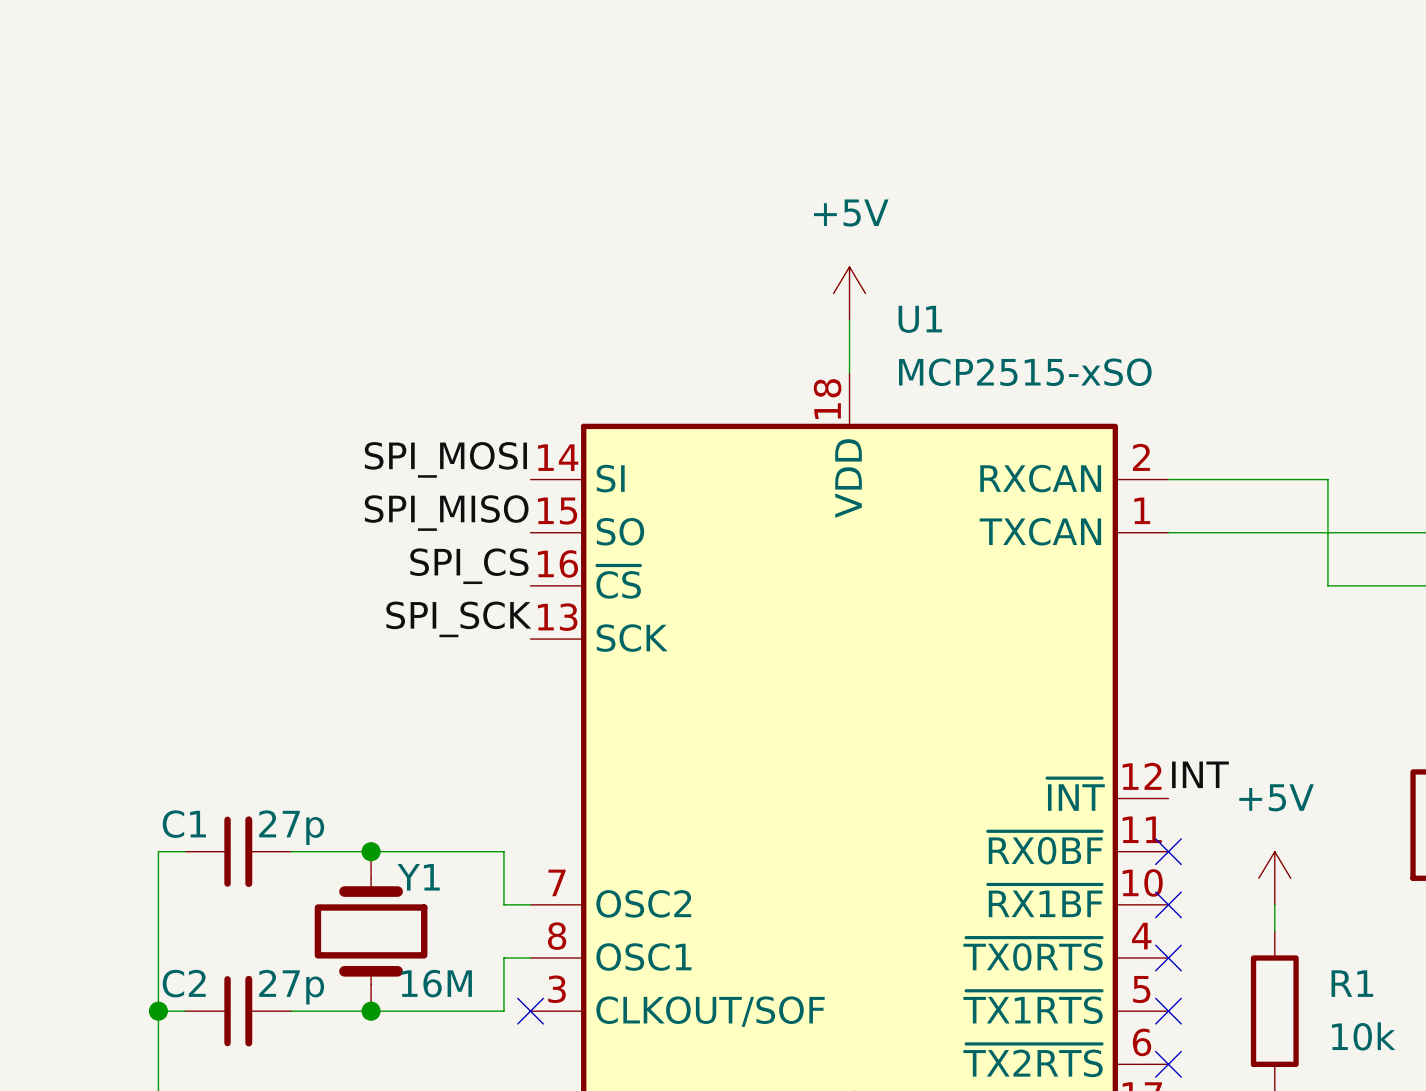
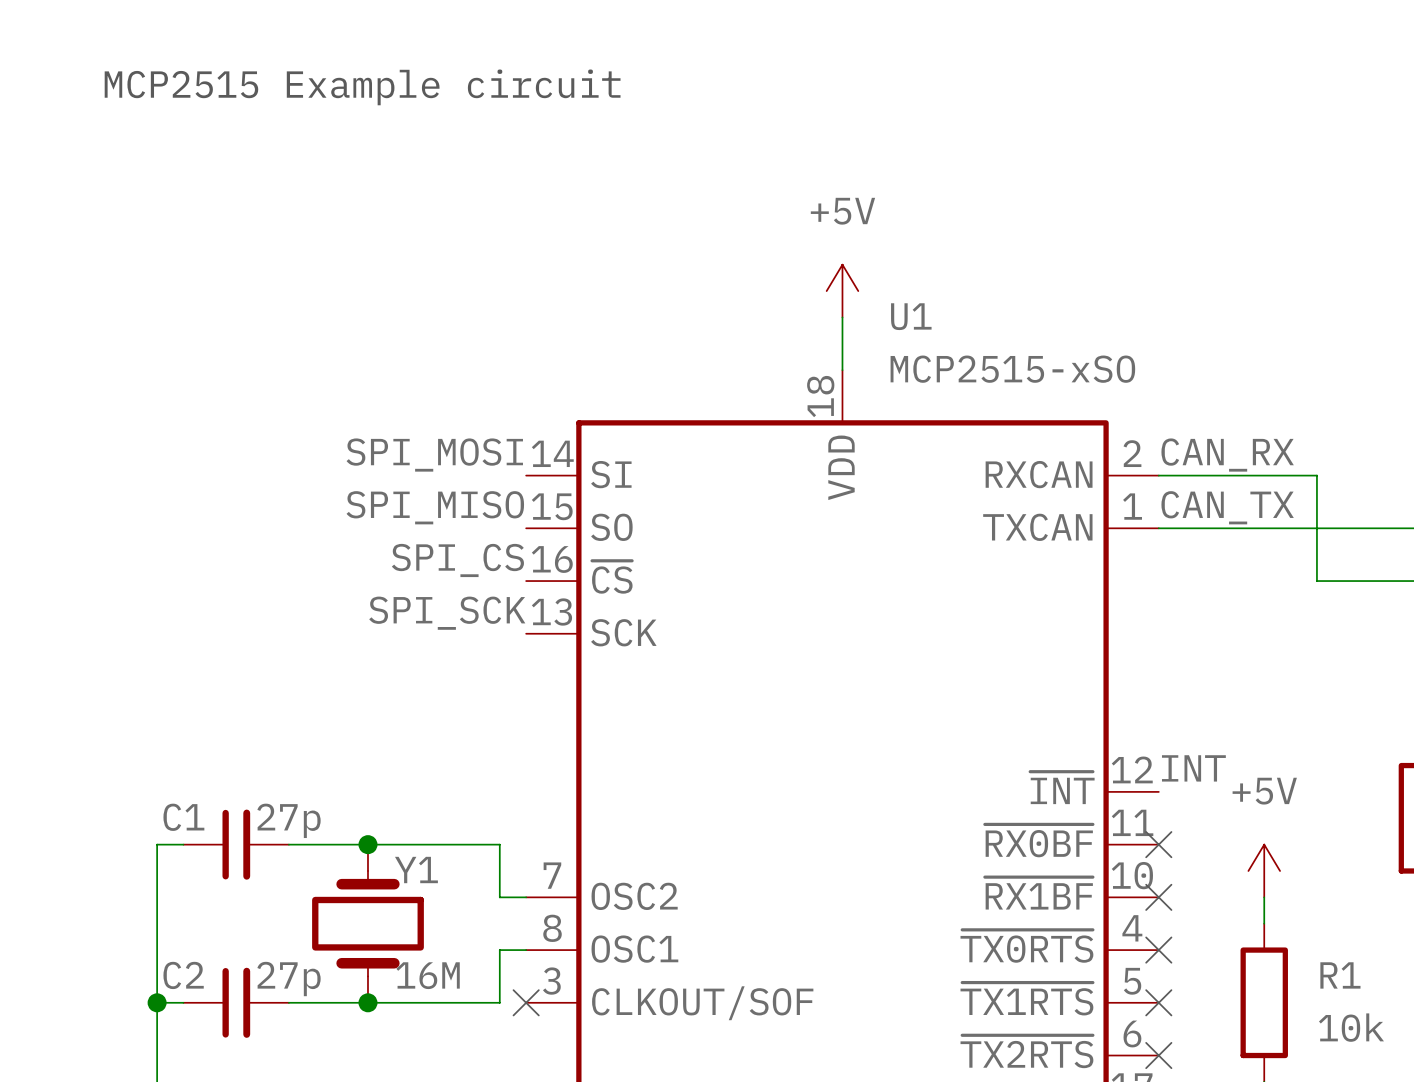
text: none -> MCP2515 Example circuit (362, 87)
label: none -> CAN_RX (1227, 455)
label: none -> CAN_TX (1227, 507)

